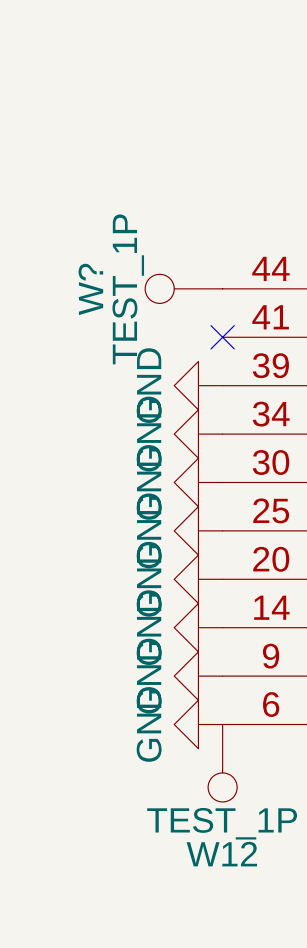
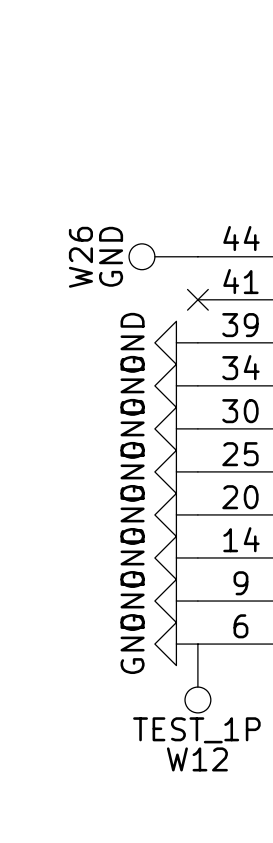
W? name: W? (90, 289) -> W26 (80, 257)
W? value: TEST_1P (128, 289) -> GND (111, 256)

